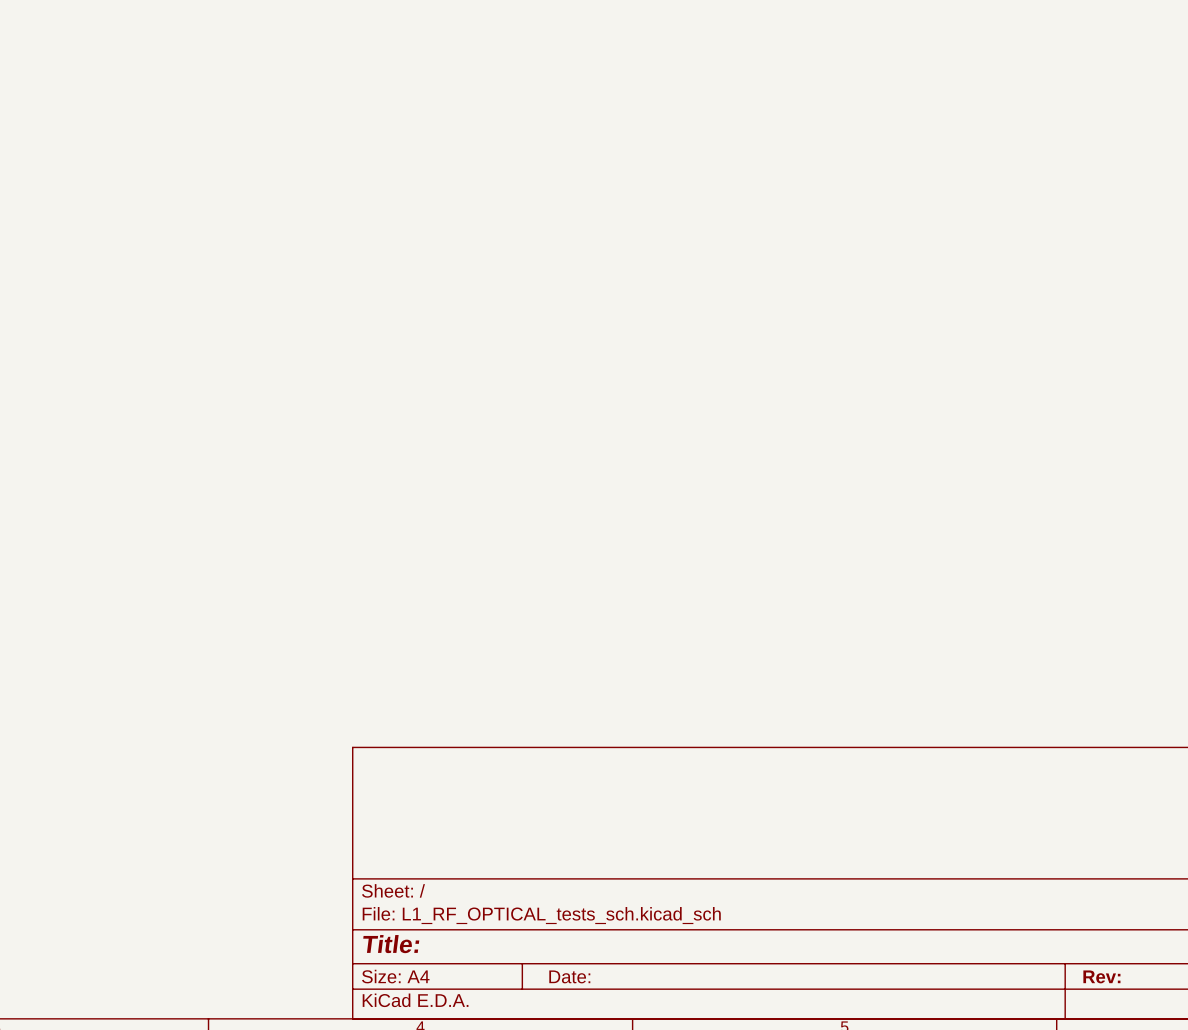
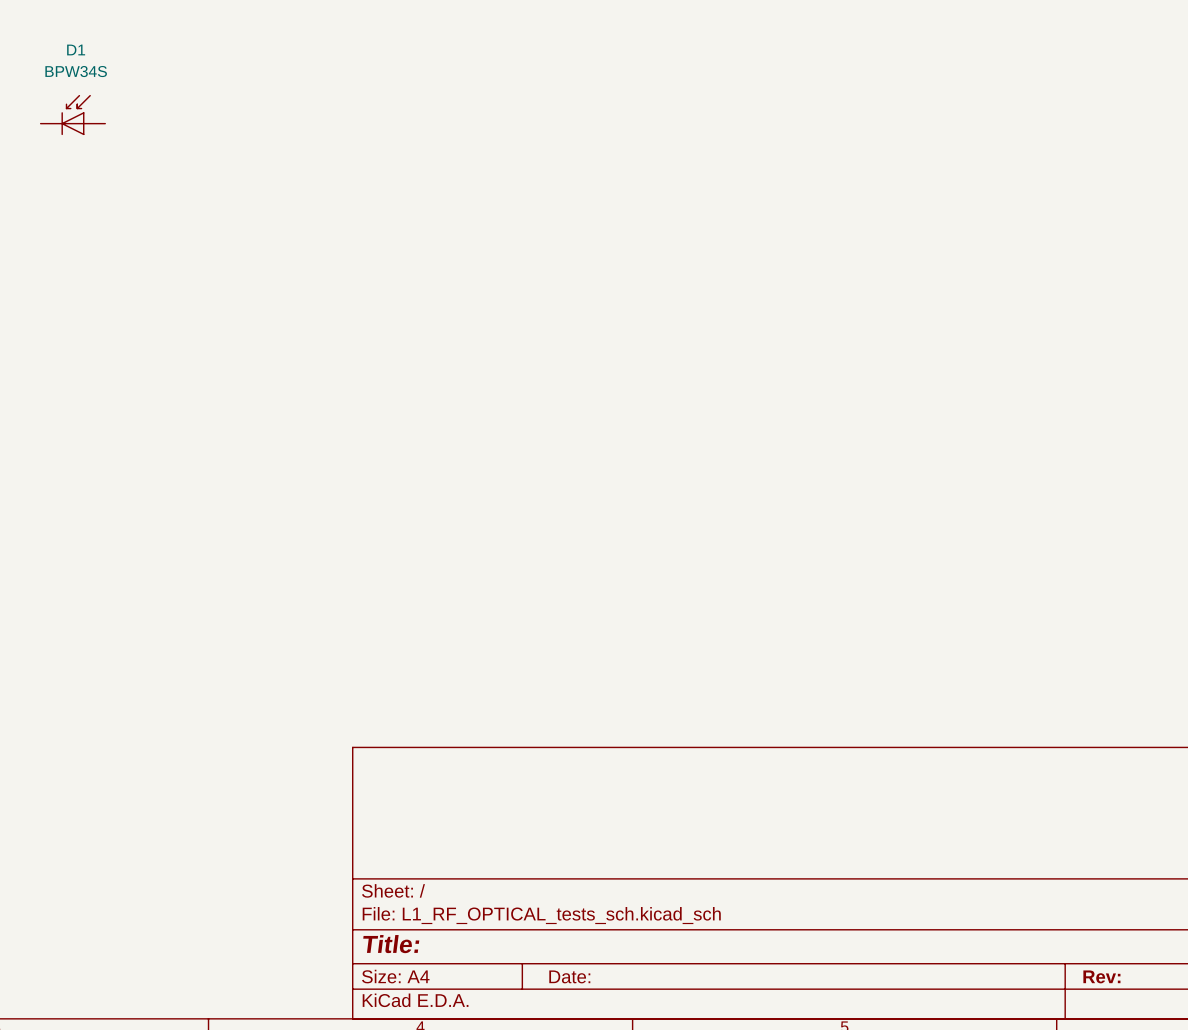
D1: none -> BPW34S (72, 115)

